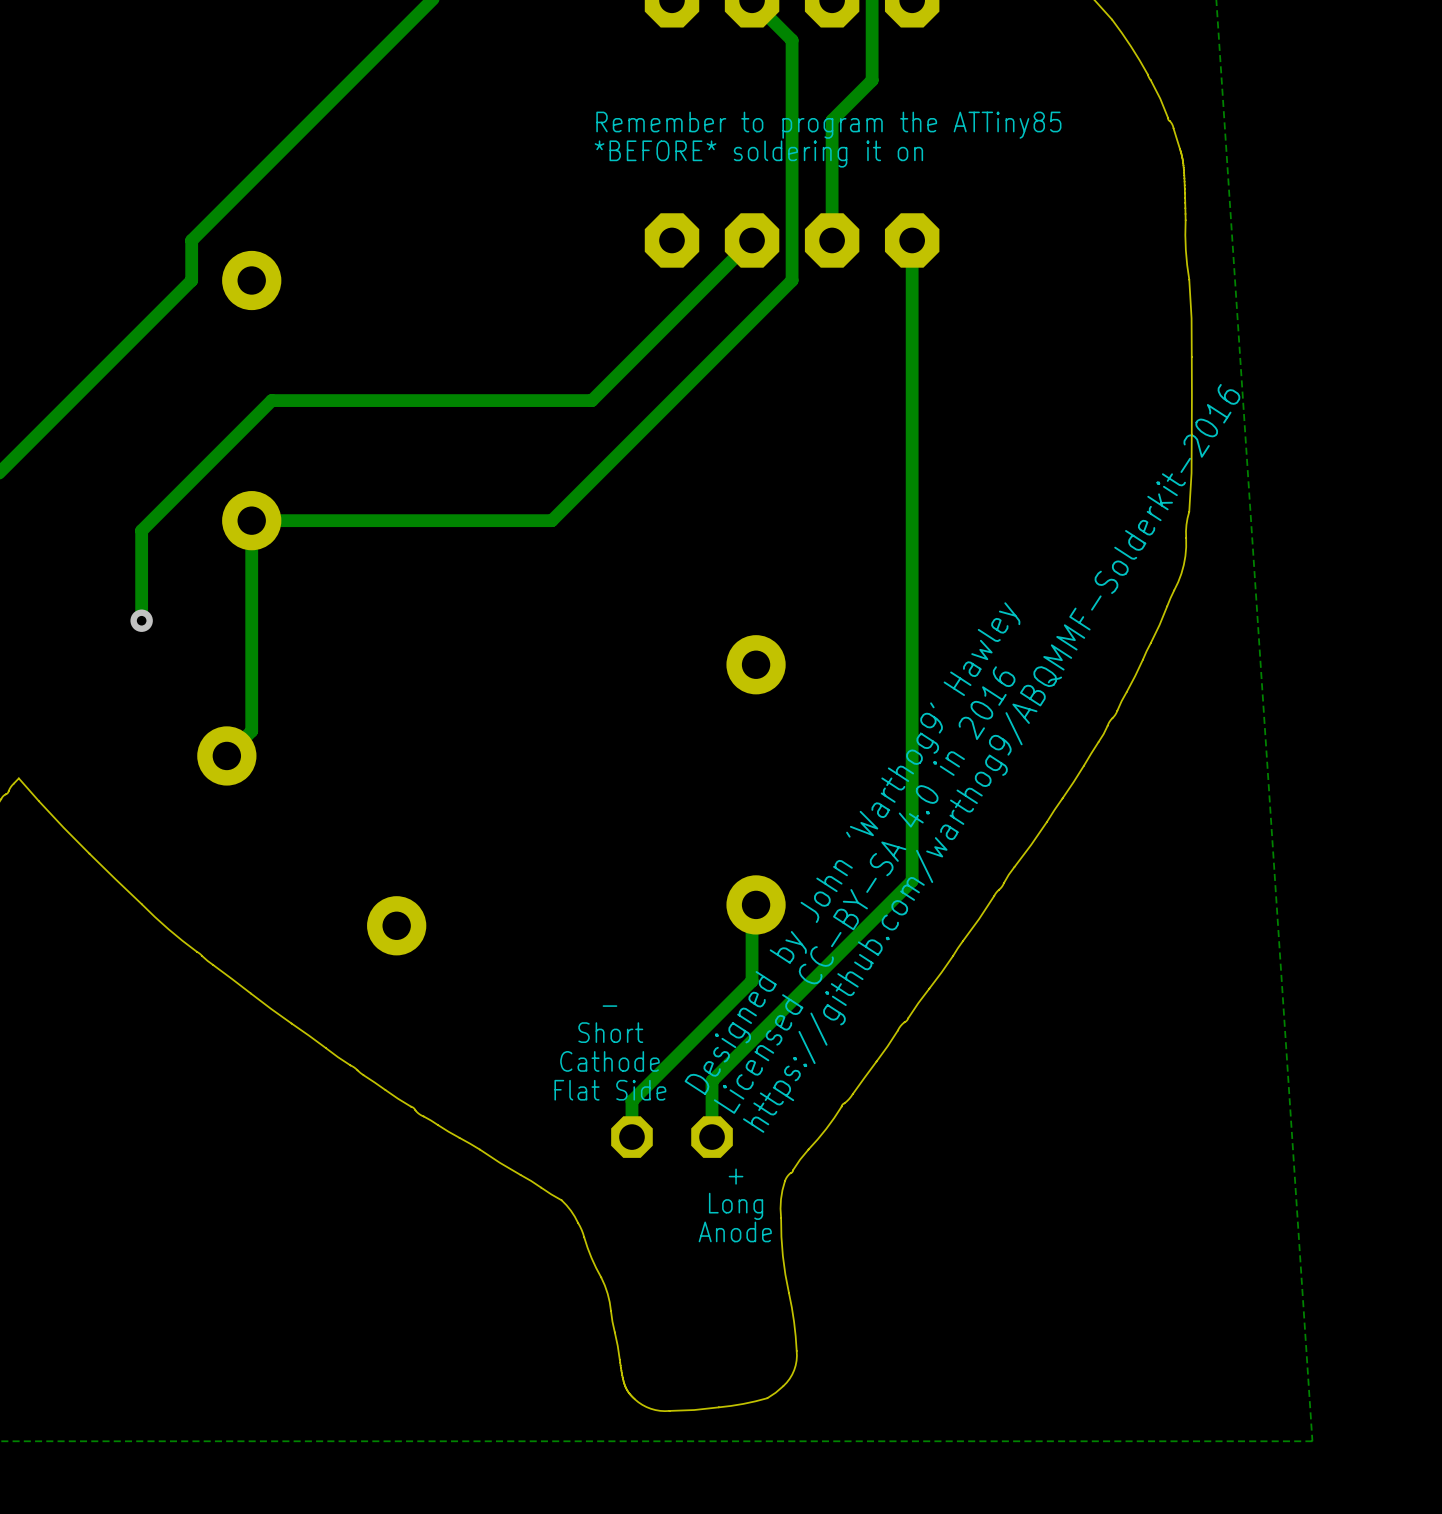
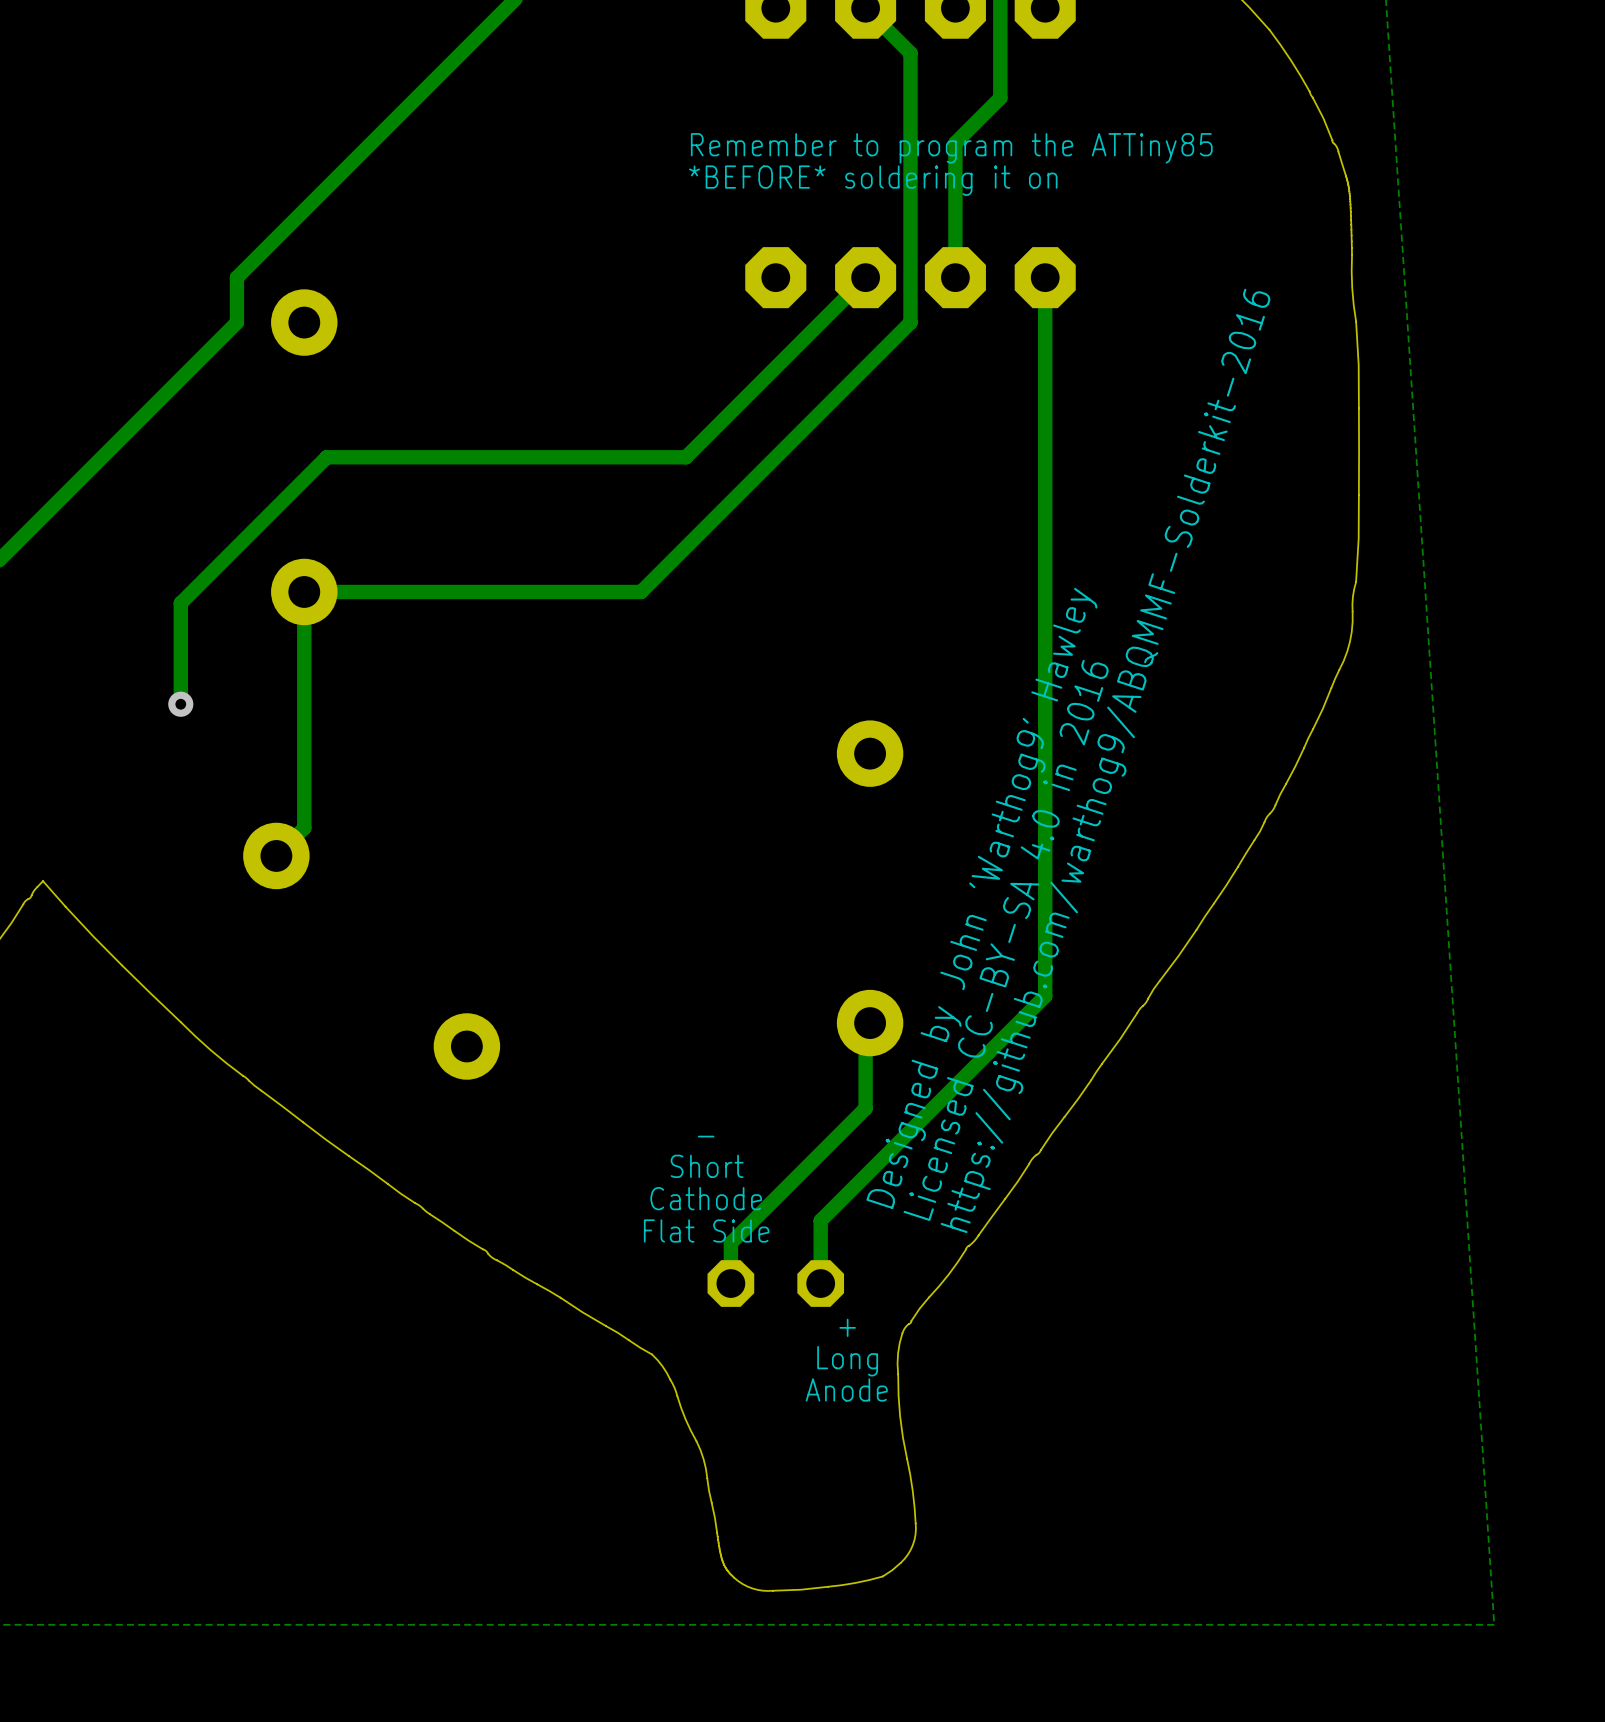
text rotation: 0° (991, 758) -> 15° counterclockwise (1105, 760)
text rotation: 0° (852, 848) -> 15° counterclockwise (981, 898)
text rotation: 0° (864, 890) -> 15° counterclockwise (1006, 940)

